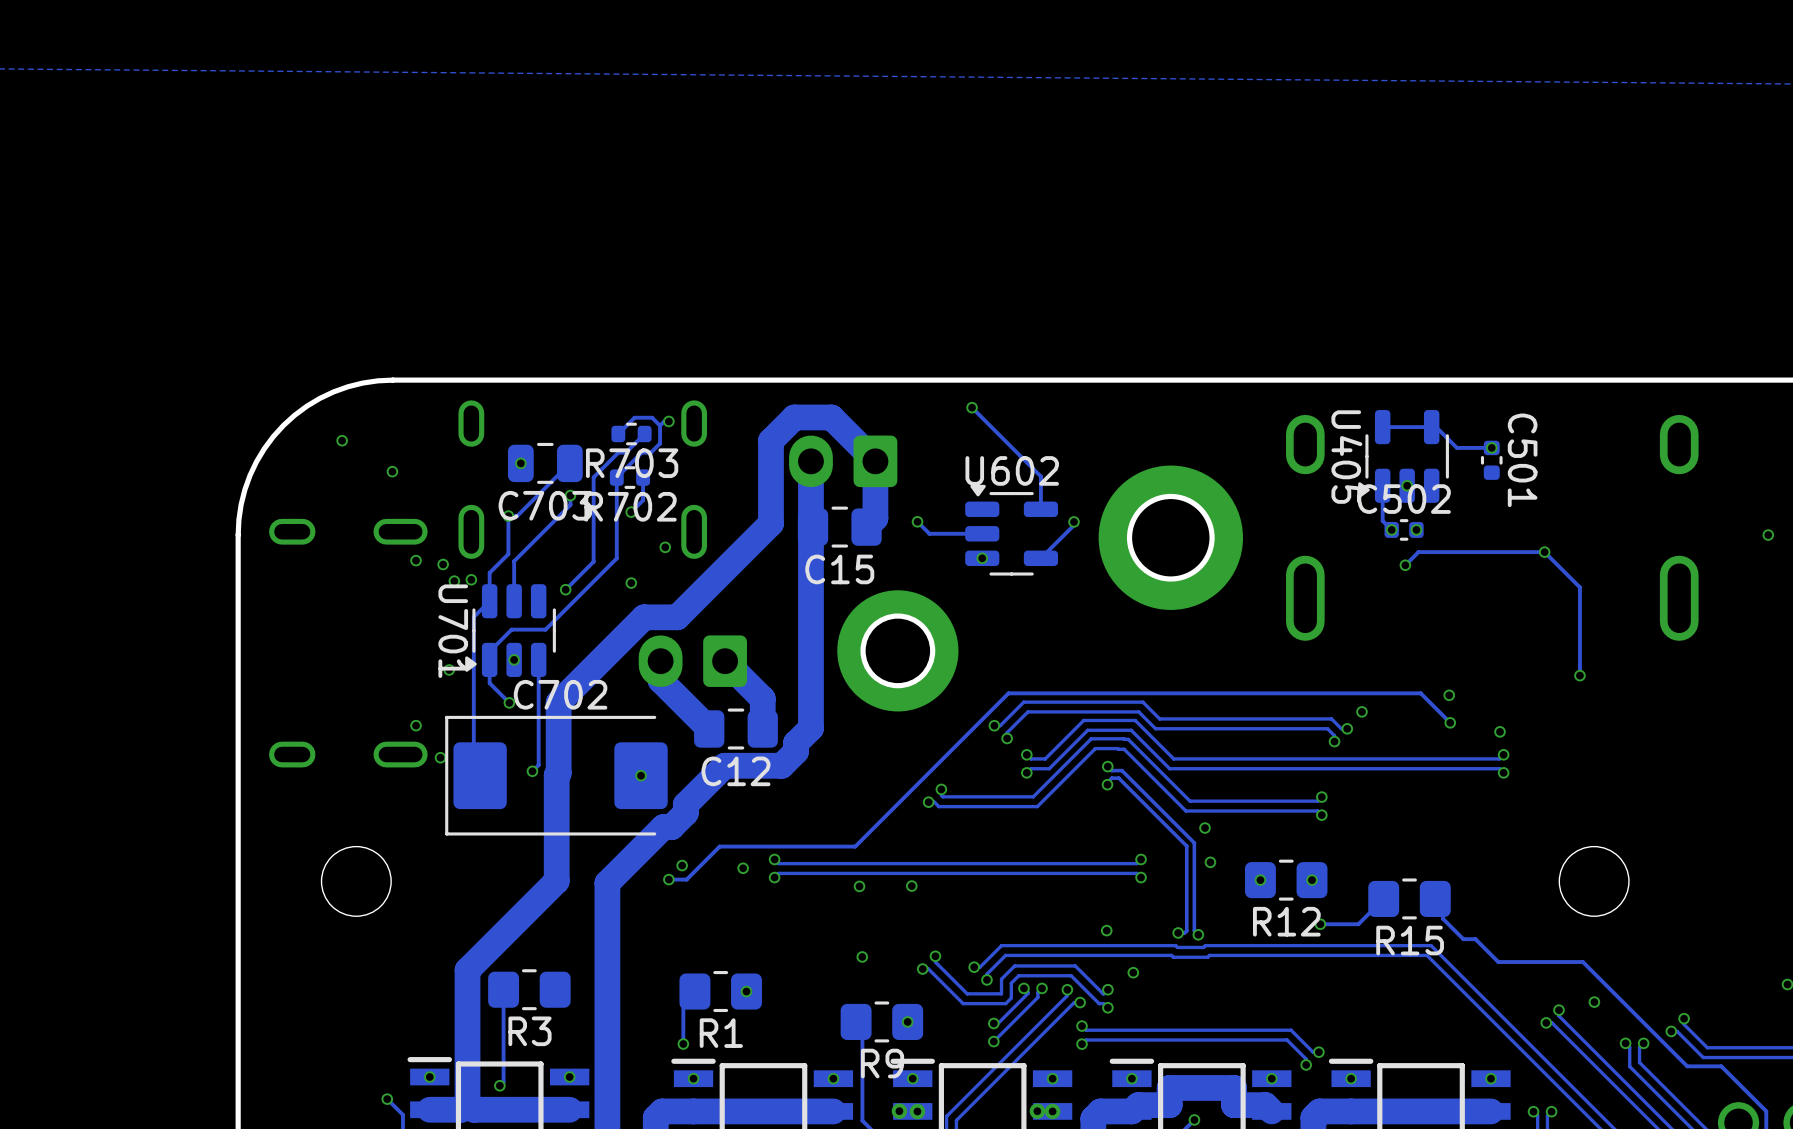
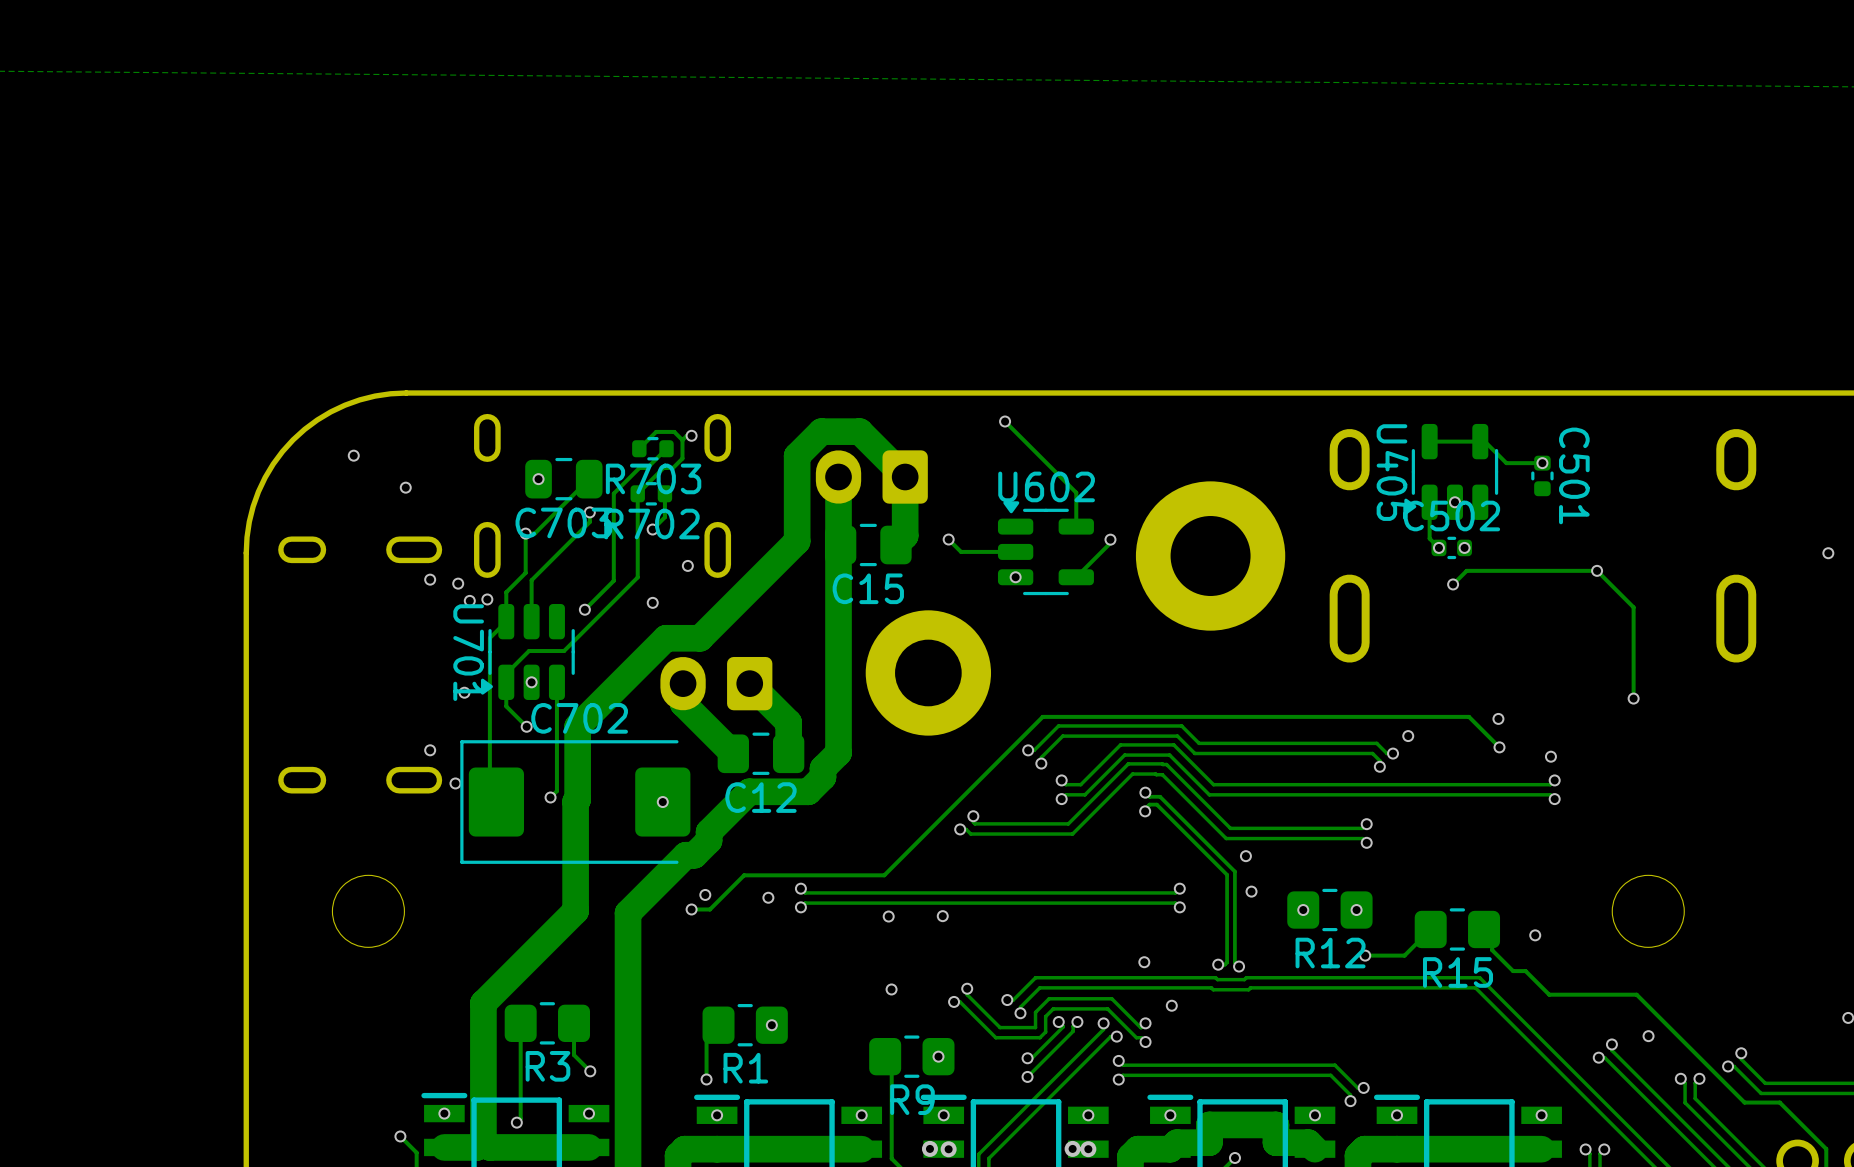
via: none -> (1535, 935)
track: none -> (574, 1023) (574, 1055) (590, 1071)
via: none -> (590, 1071)

